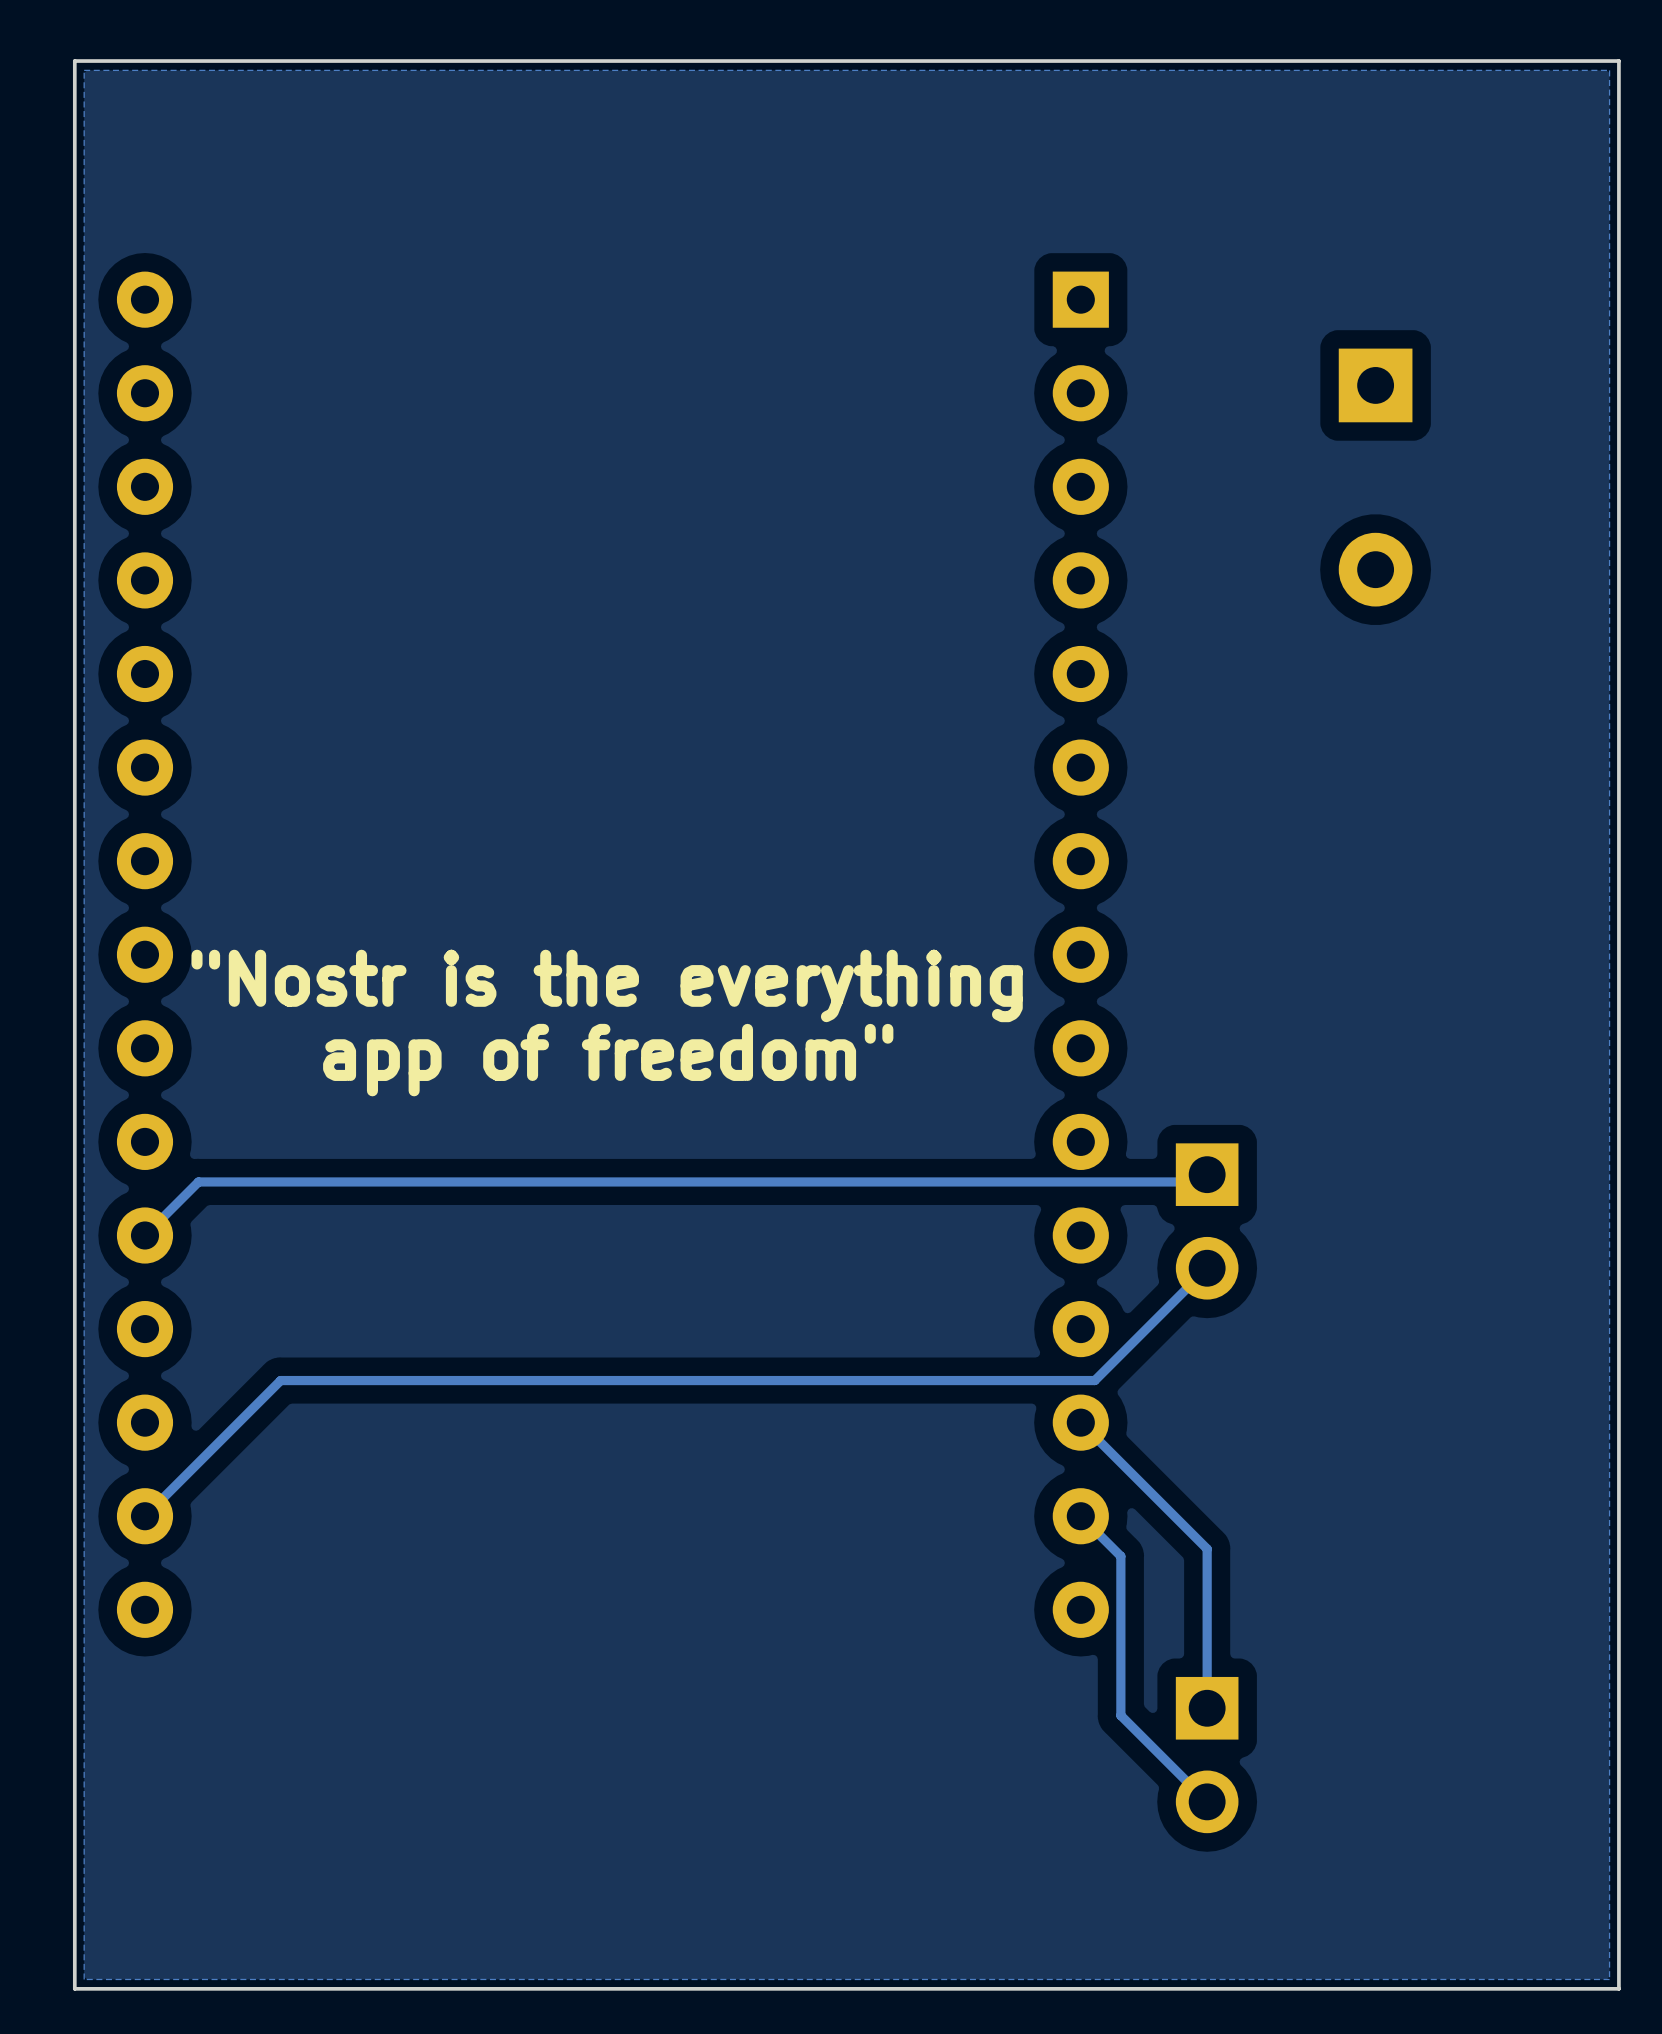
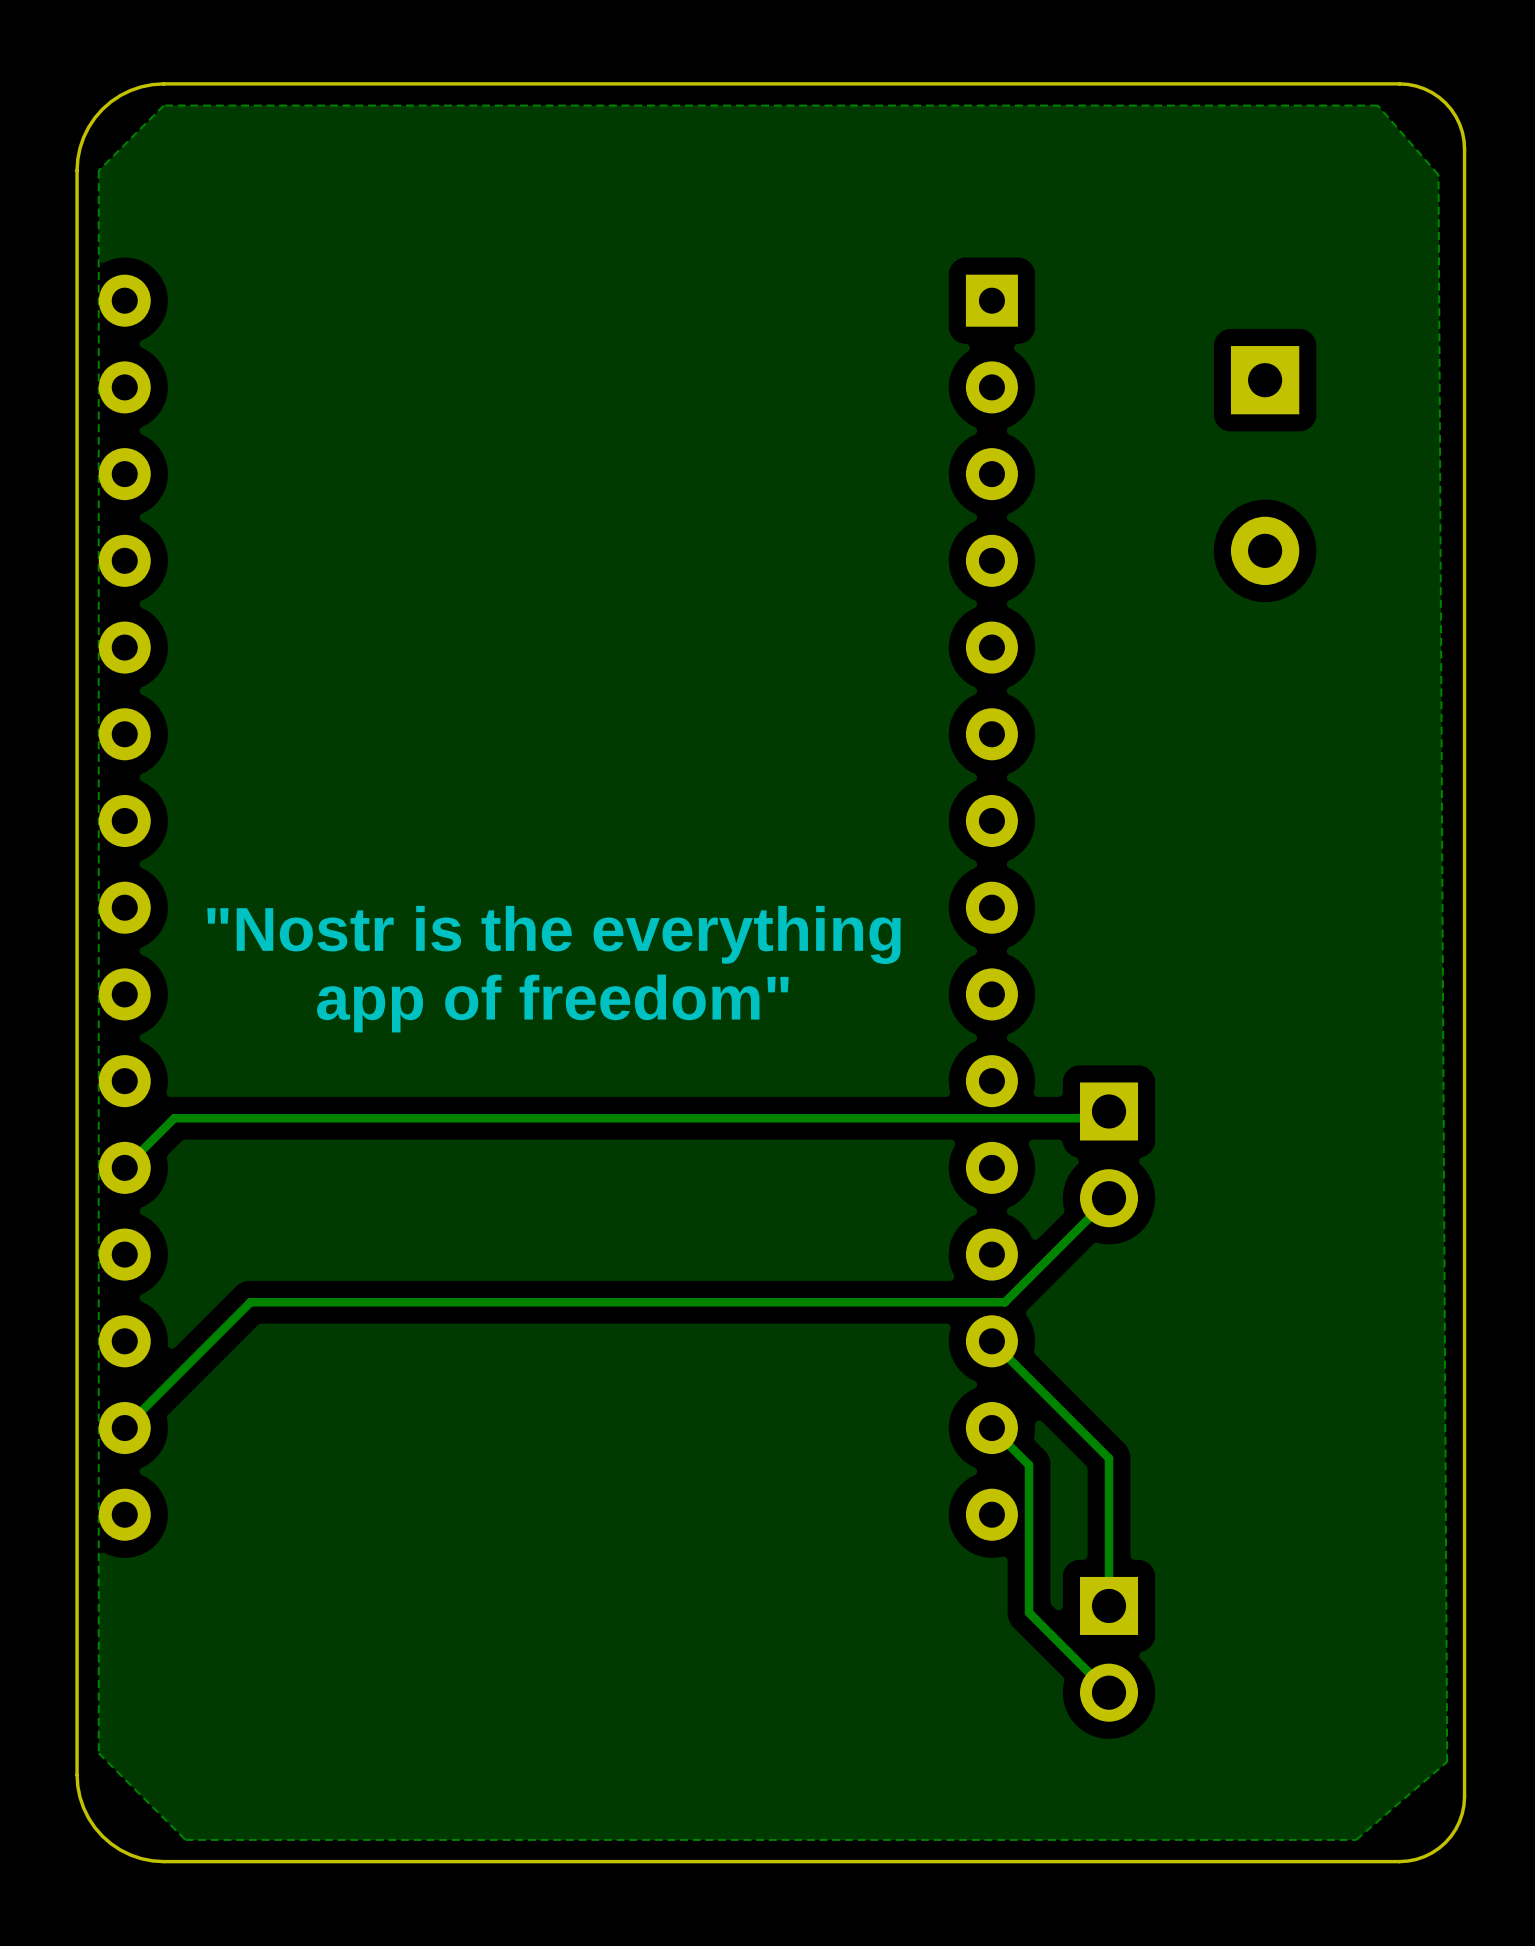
board edge: (1618, 61) (74, 61) (74, 1988) (1618, 1988) (1618, 61) -> (1399, 83) (1424, 88) (1445, 102) (1459, 124) (1464, 148) (1464, 1796) (1459, 1821) (1451, 1836) (1432, 1852) (1416, 1859) (1399, 1861) (163, 1861) (141, 1858) (110, 1843) (88, 1818) (80, 1797) (77, 1774) (77, 170) (83, 137) (94, 117) (110, 101) (130, 90) (163, 83) (1399, 83)
zone outline: (1609, 70) (1609, 1979) (84, 1979) (84, 70) (1609, 70) -> (1377, 105) (1438, 174) (1447, 1761) (1356, 1839) (185, 1839) (98, 1753) (98, 170) (163, 105) (1377, 105)

